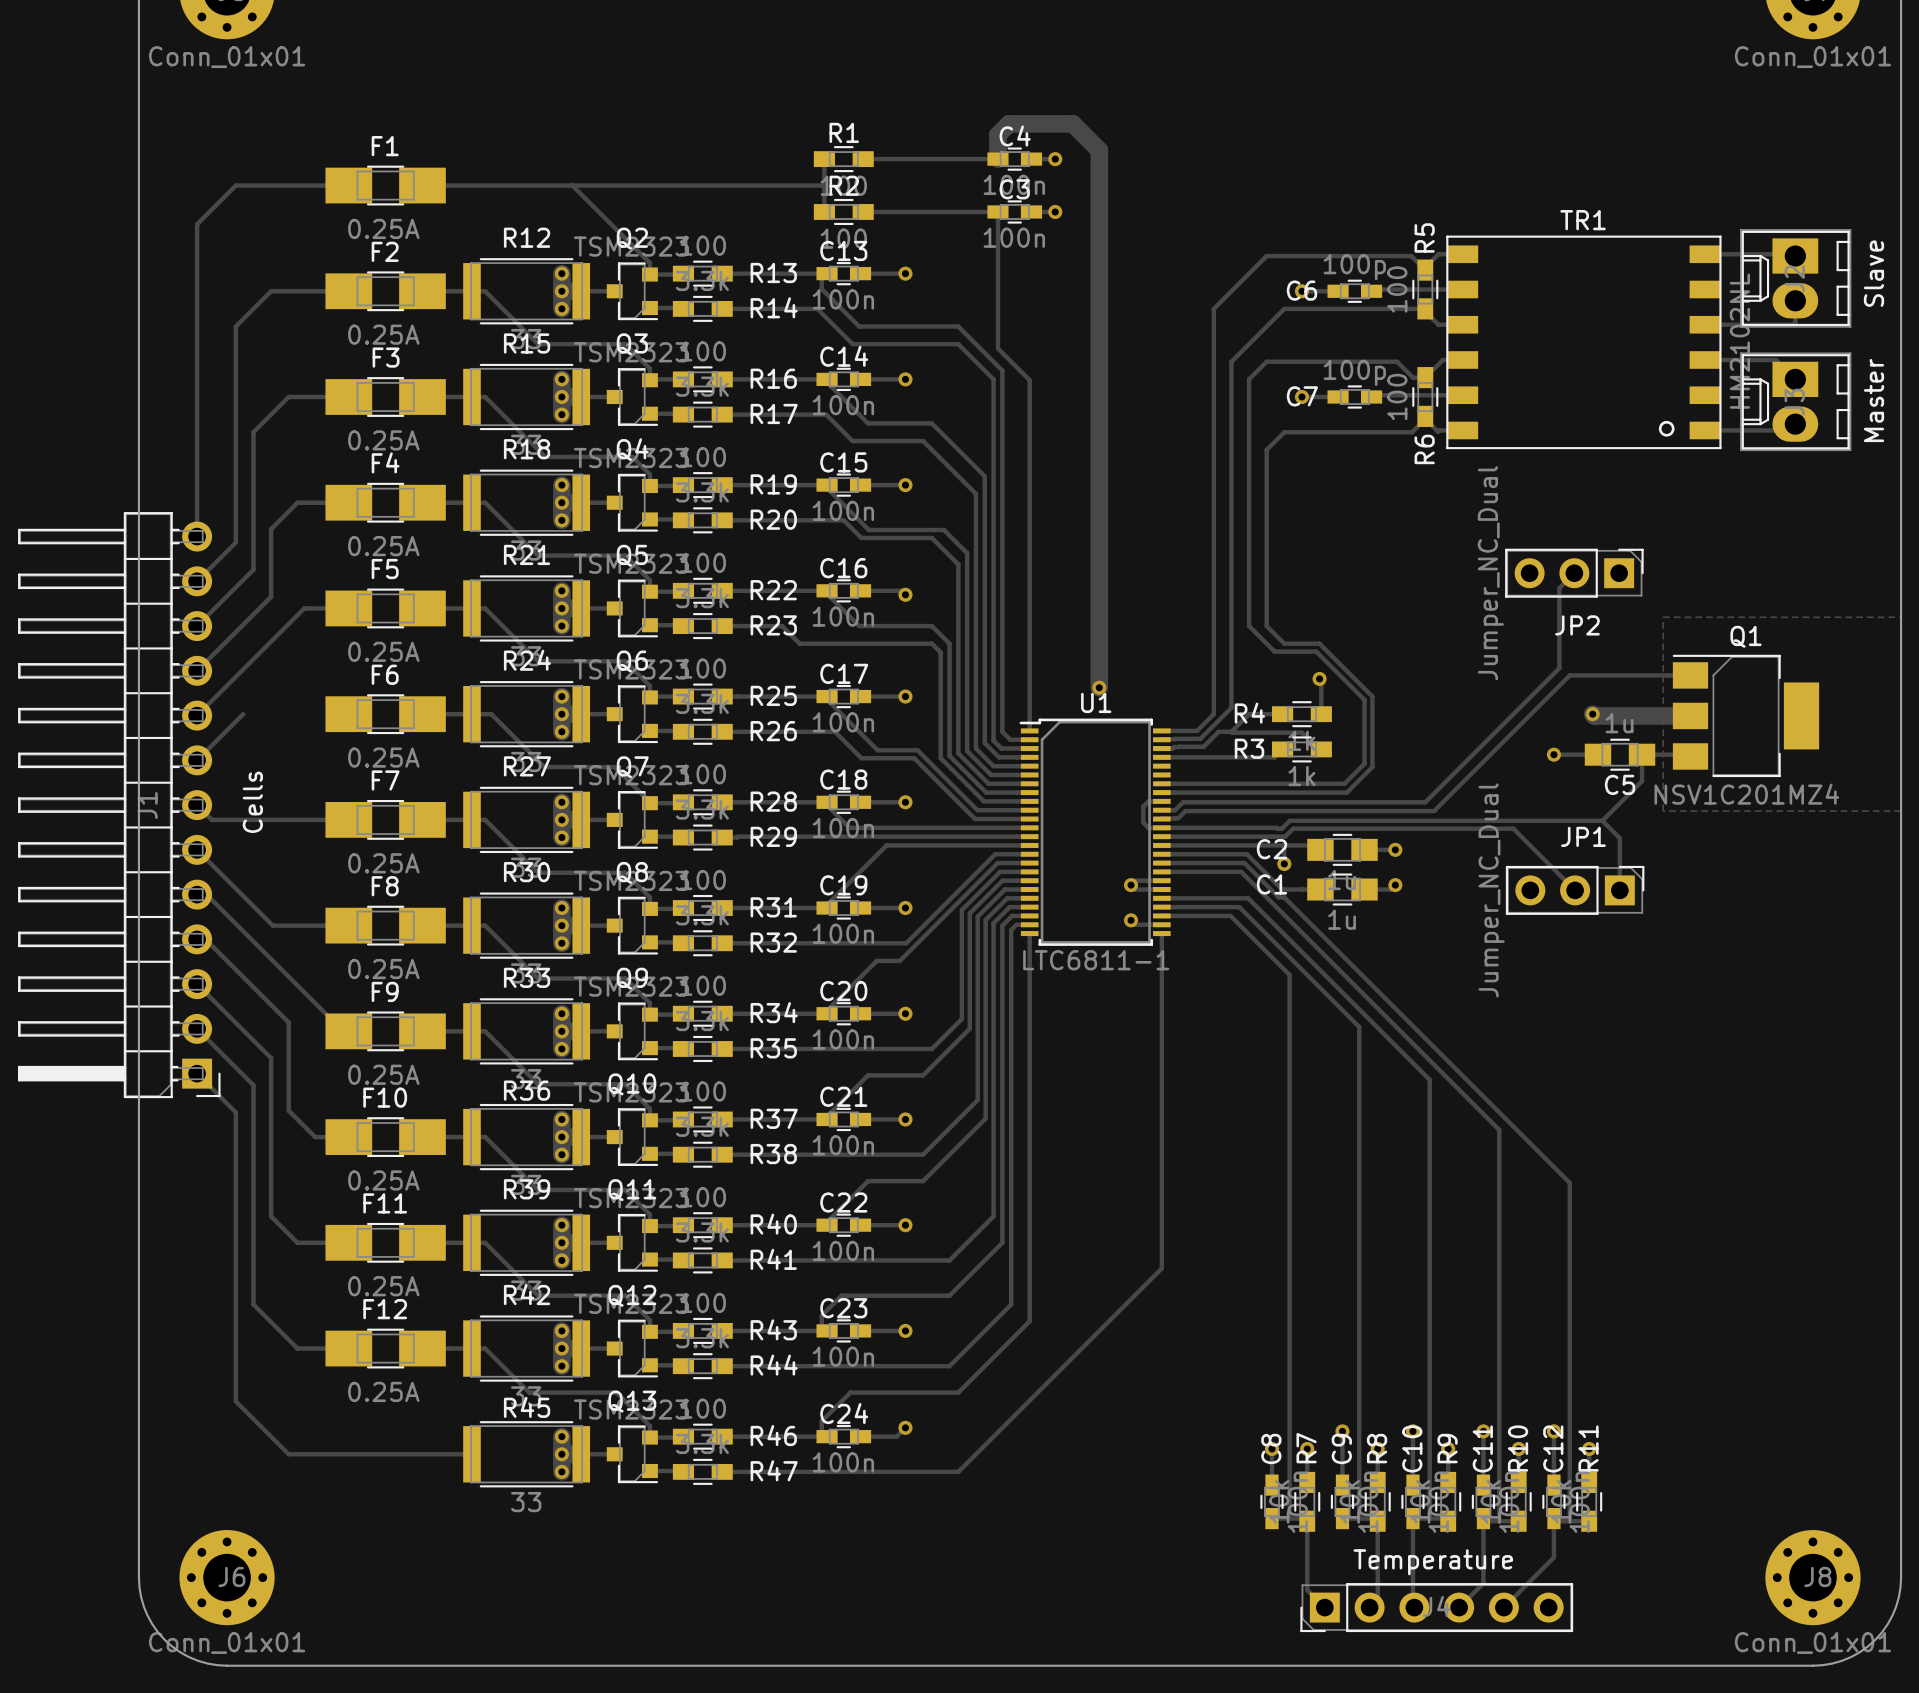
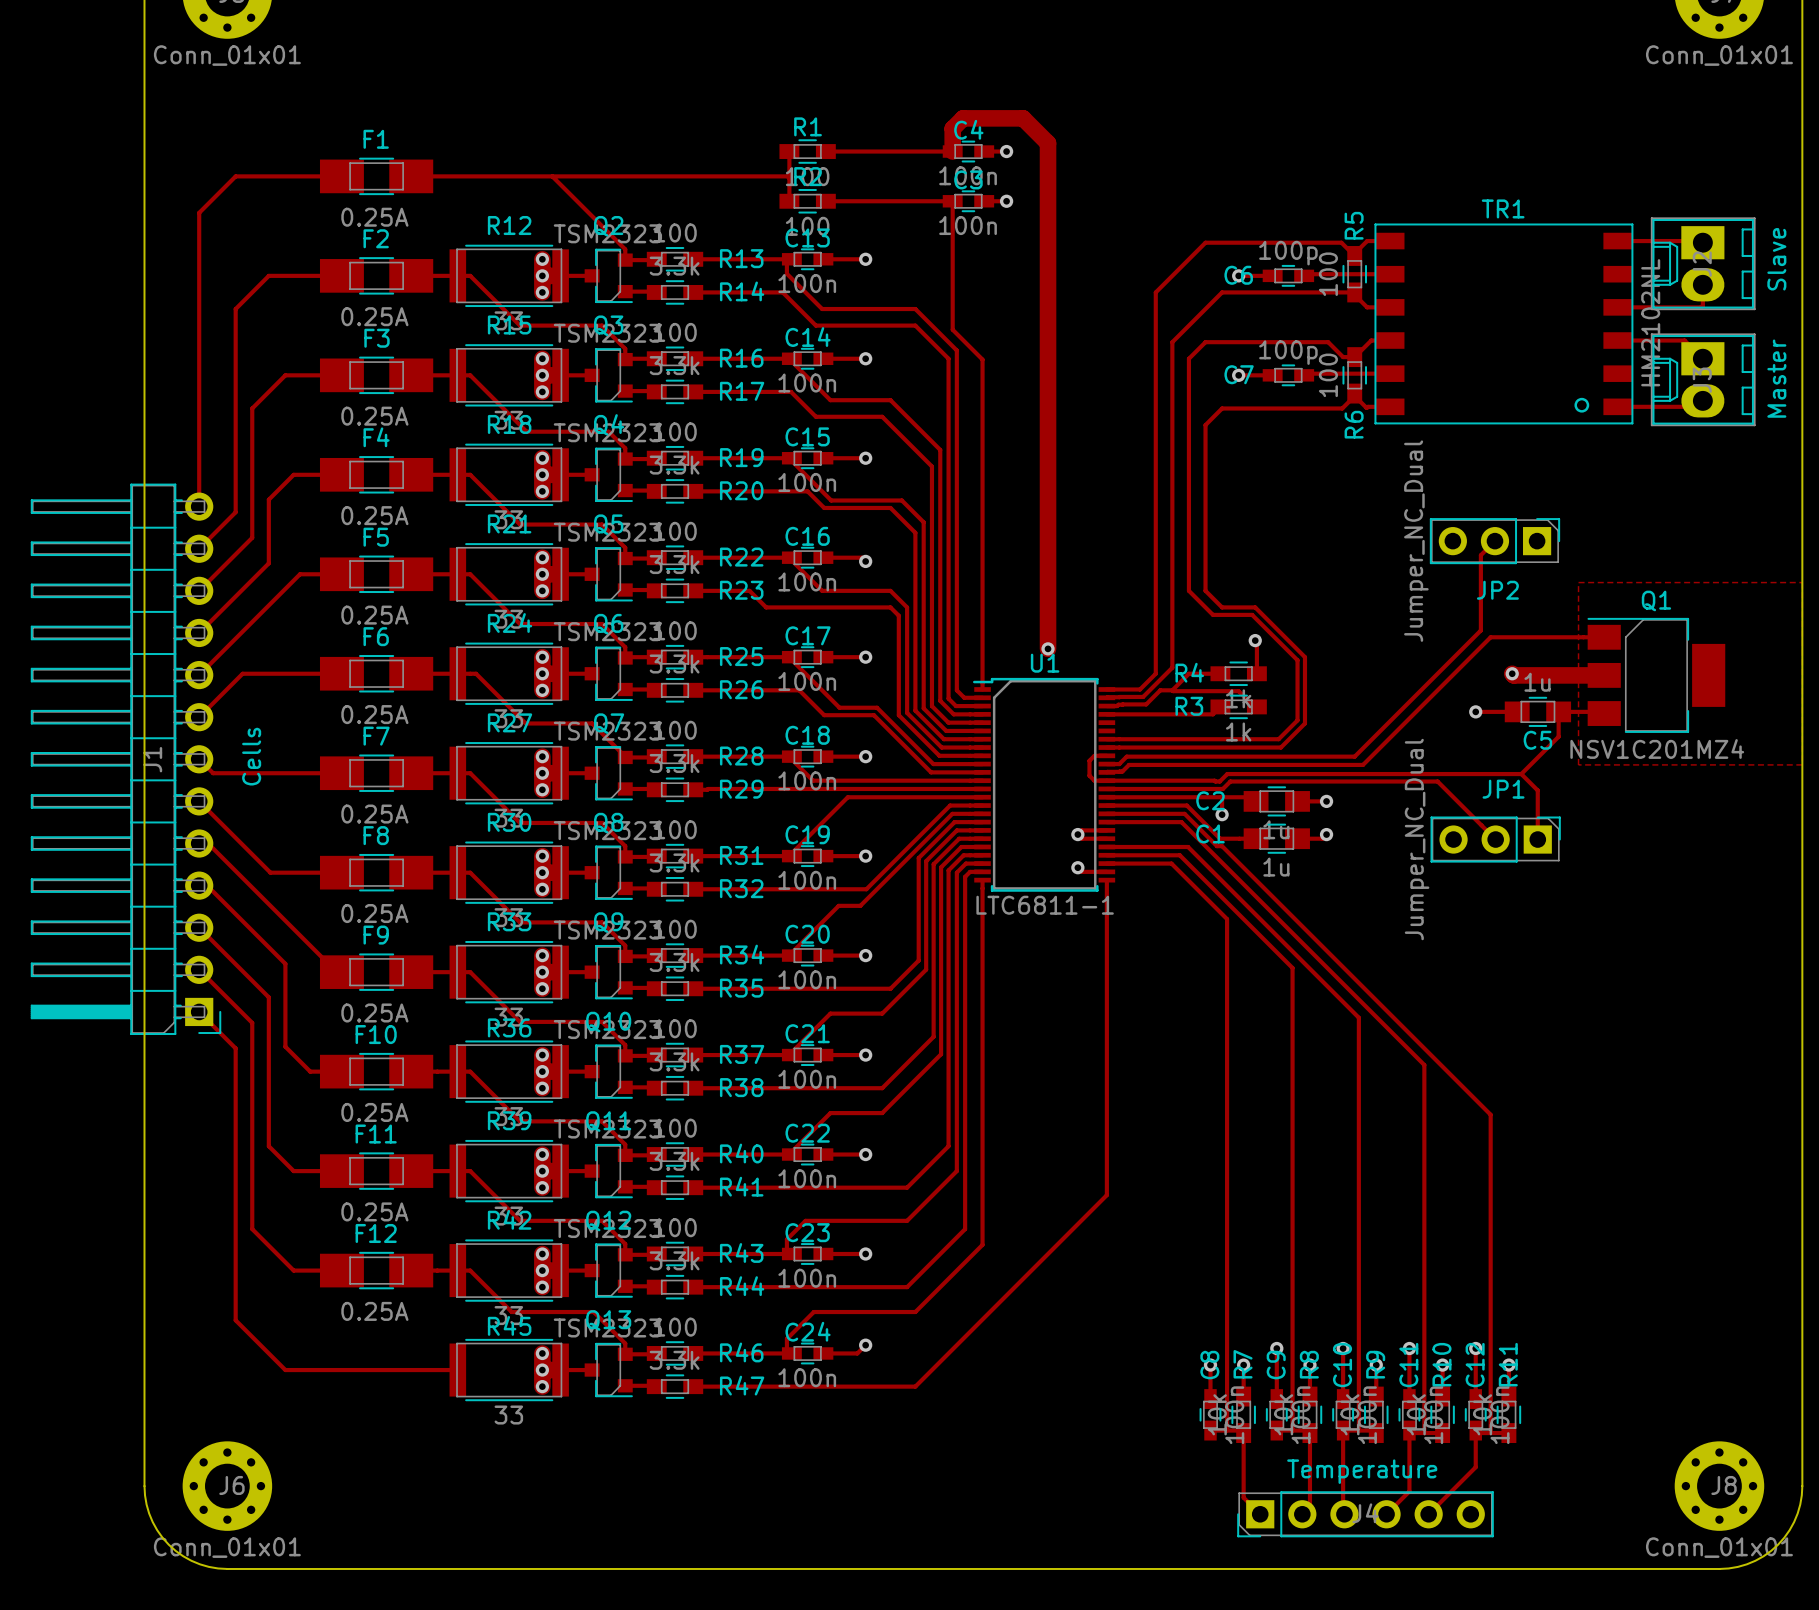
track: none -> (242, 673) (341, 673)

